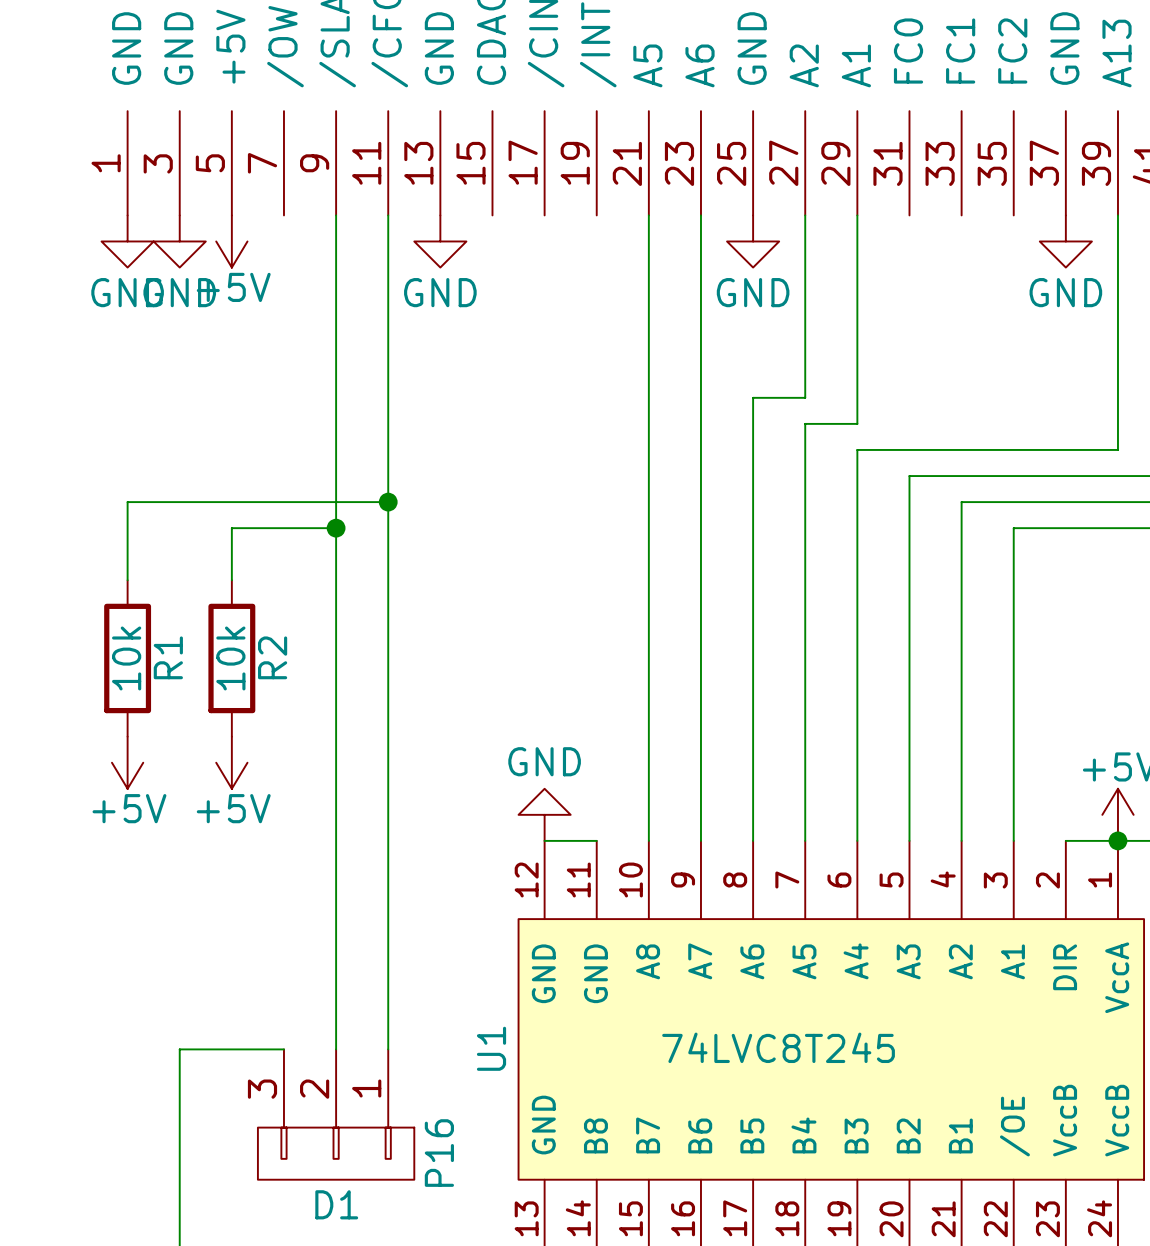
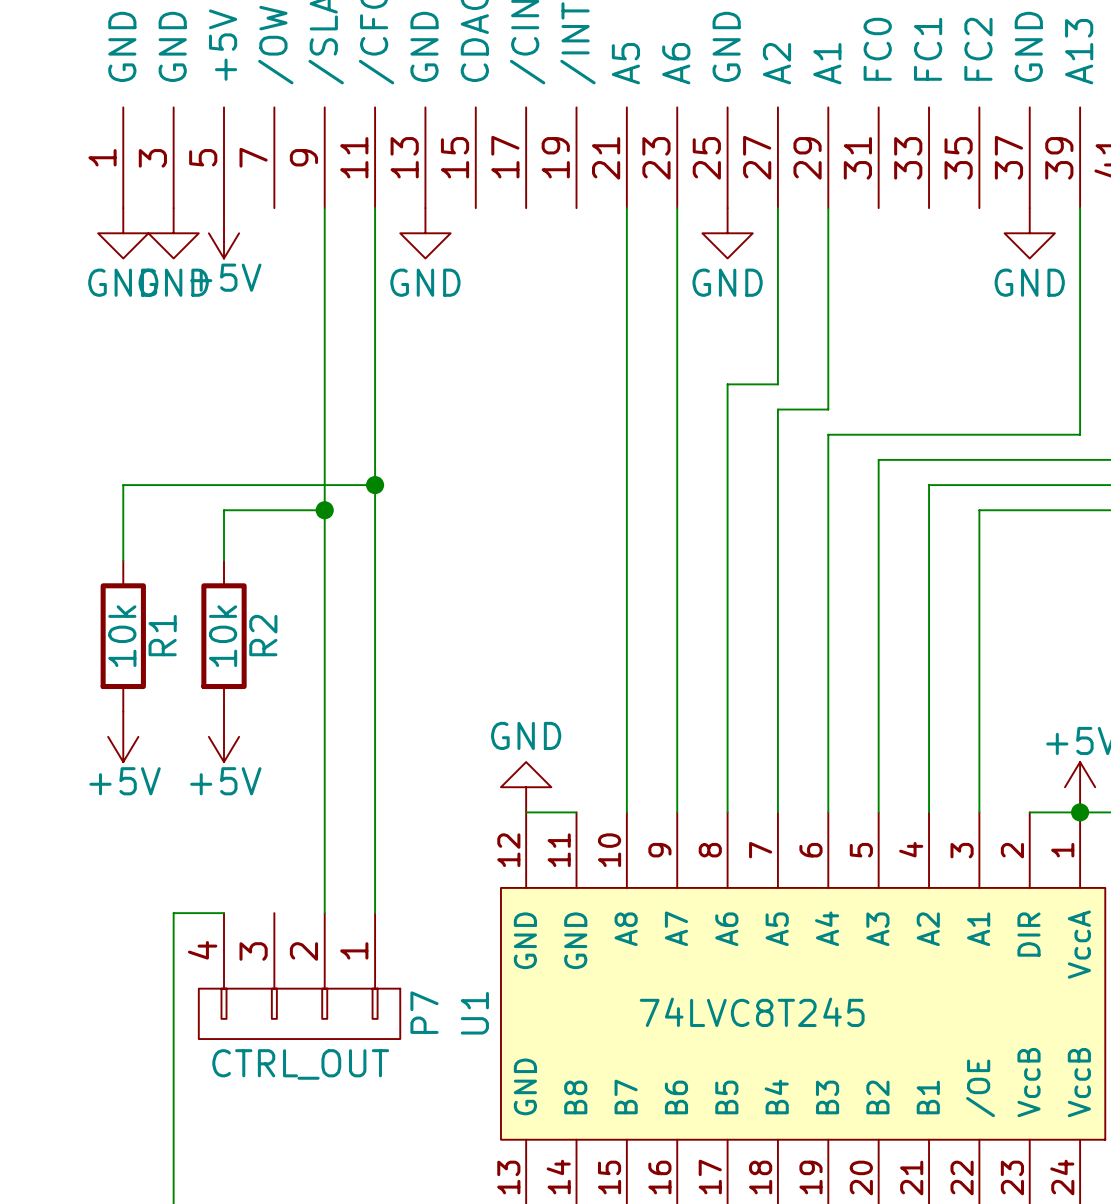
P7: none -> CTRL_OUT (299, 976)
wire: (179, 1049) (283, 1049) -> (173, 1013) (173, 913) (224, 913)
P16: D1 (336, 1114) -> none

